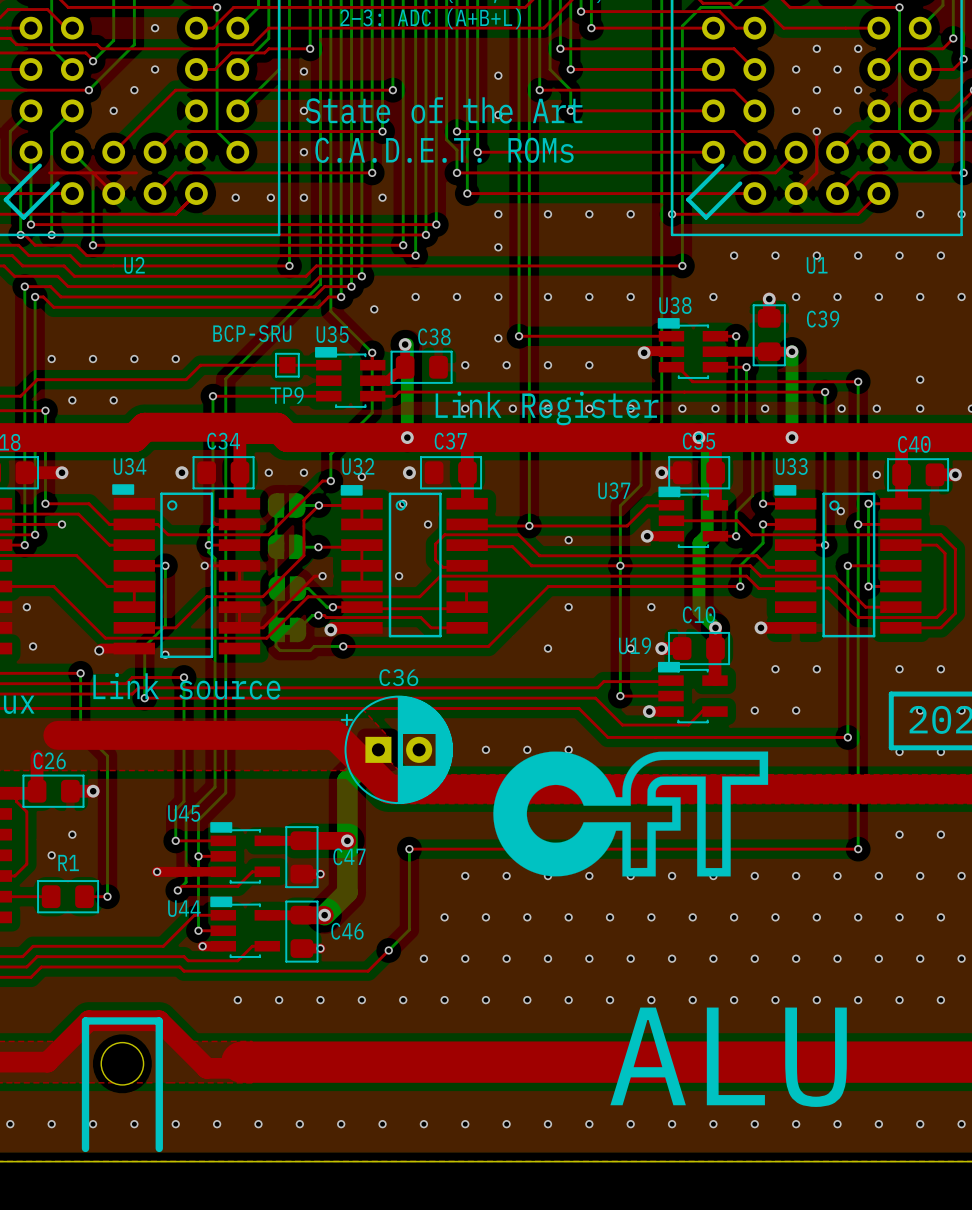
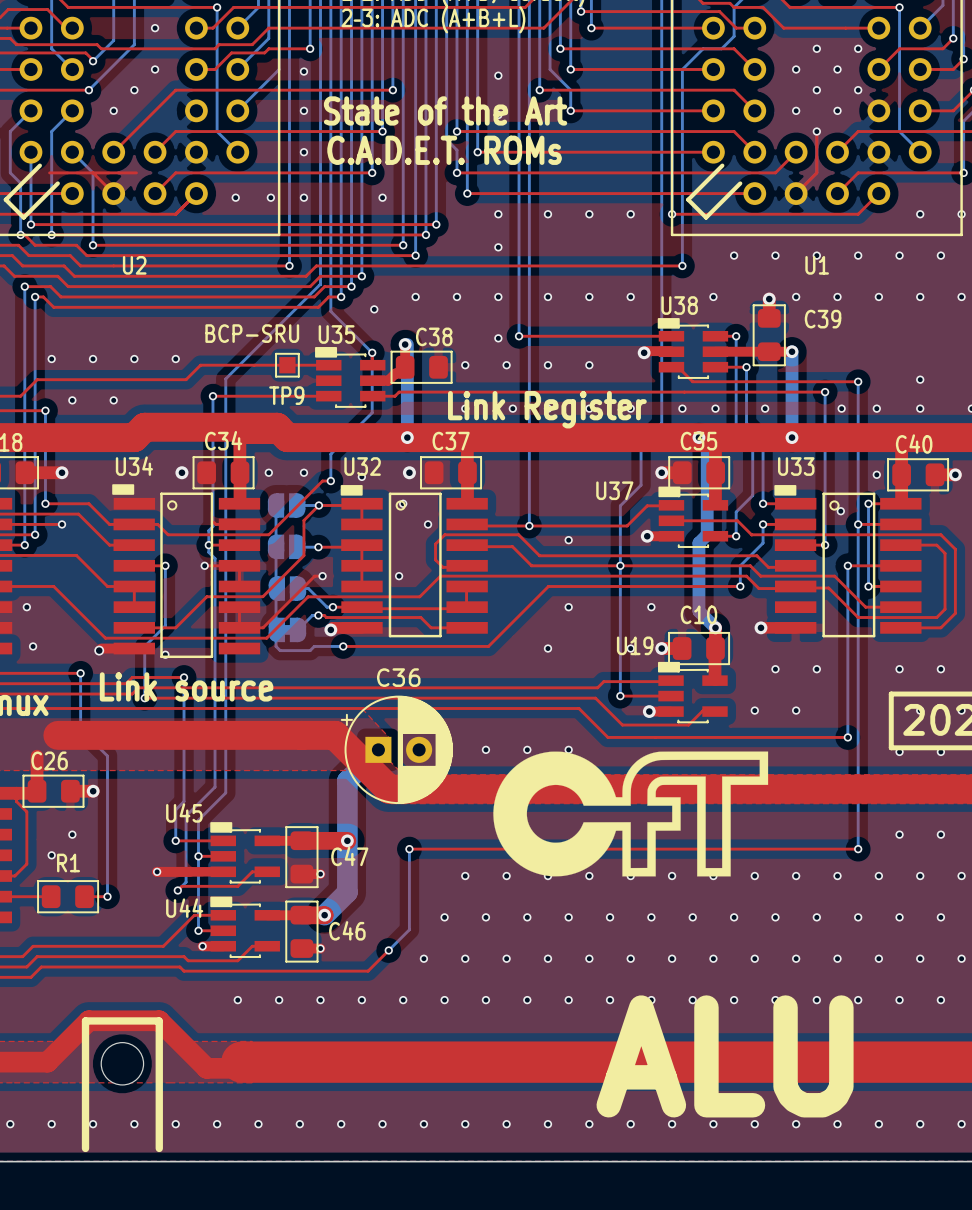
bottom track: (734, 7) (701, 7) (682, 26) (682, 69) -> (734, 7) (734, 36) (721, 48) (703, 48) (682, 69)

